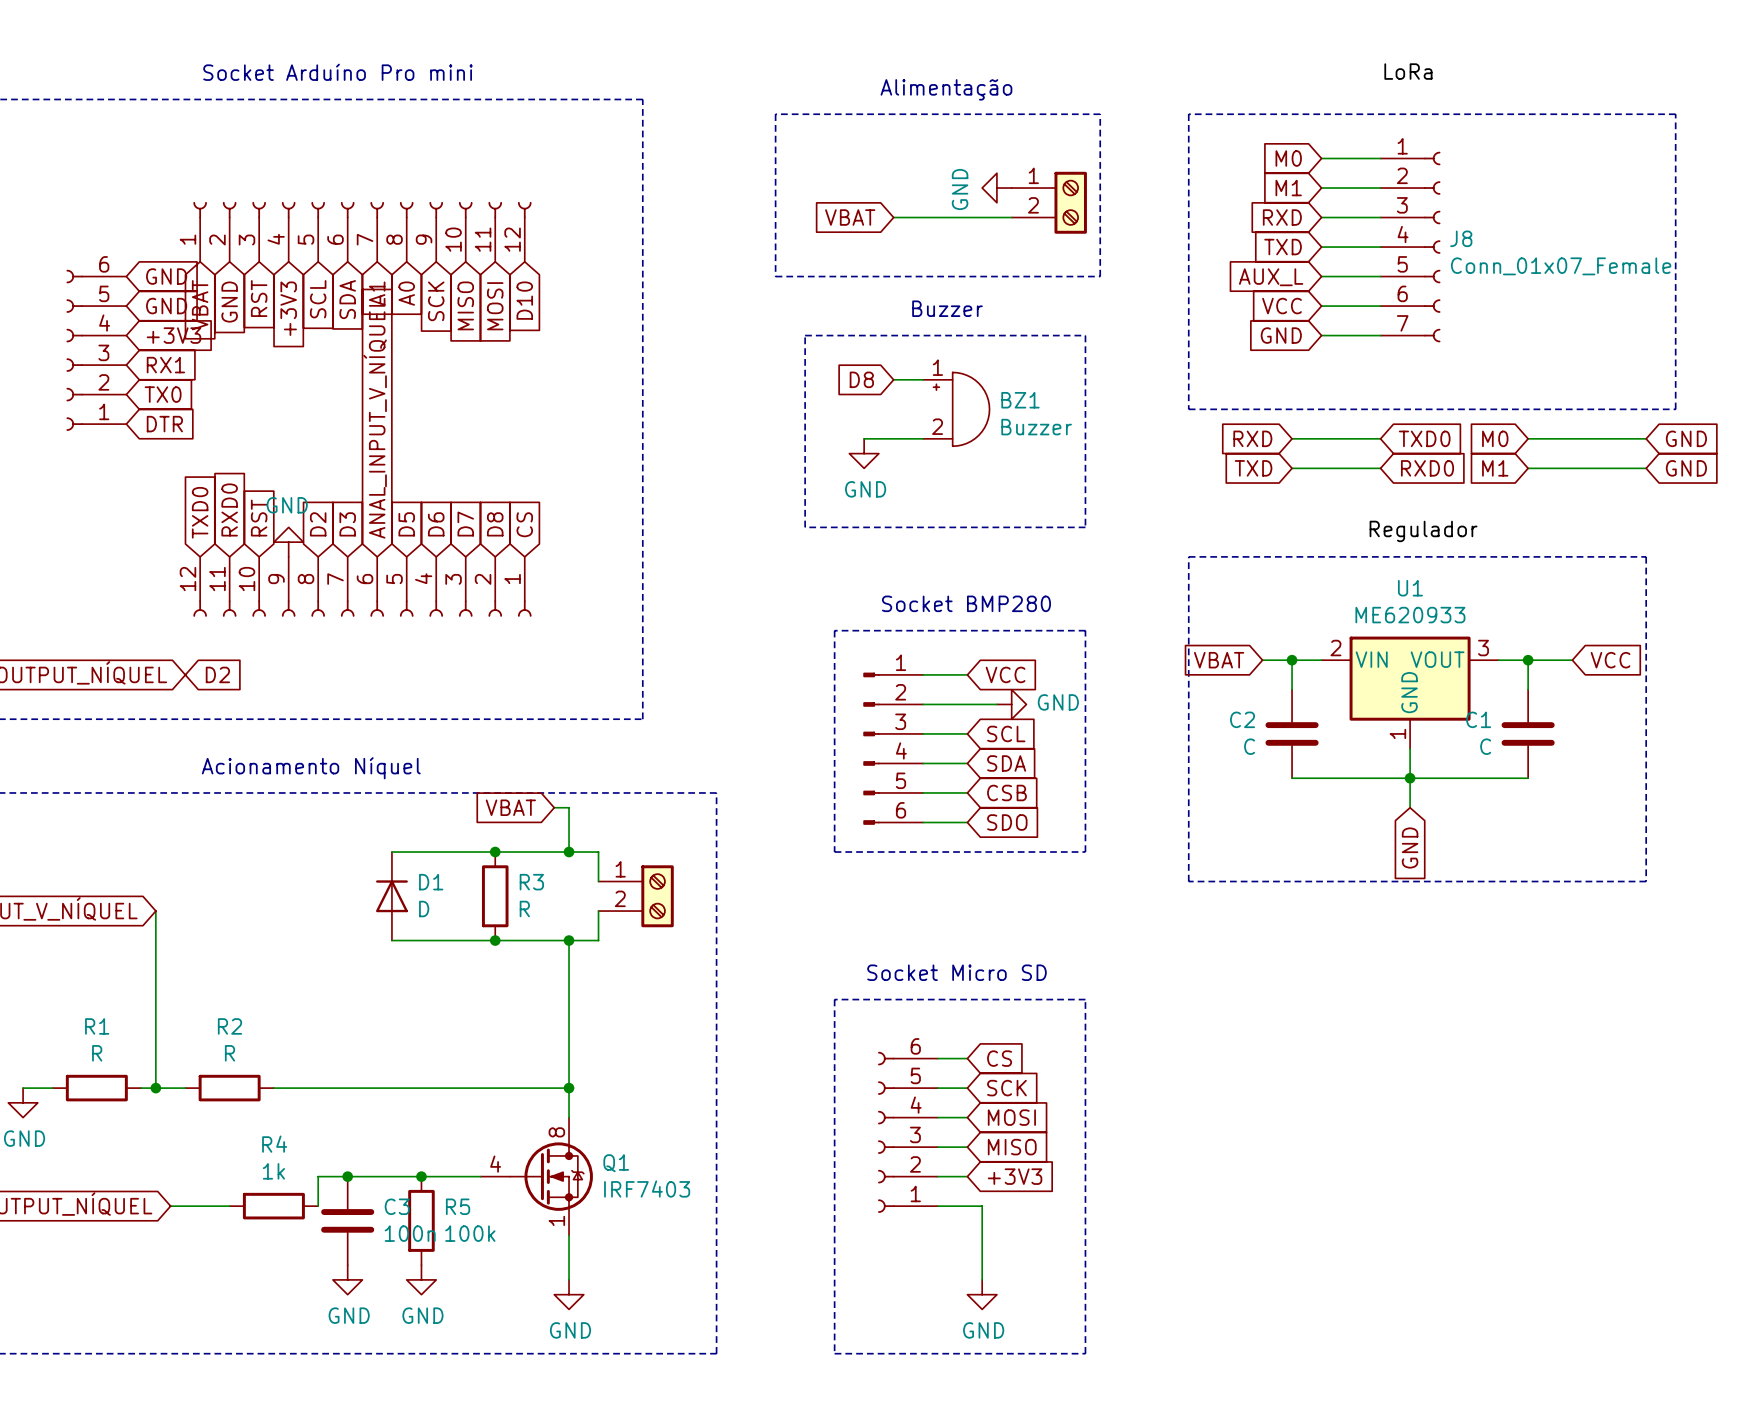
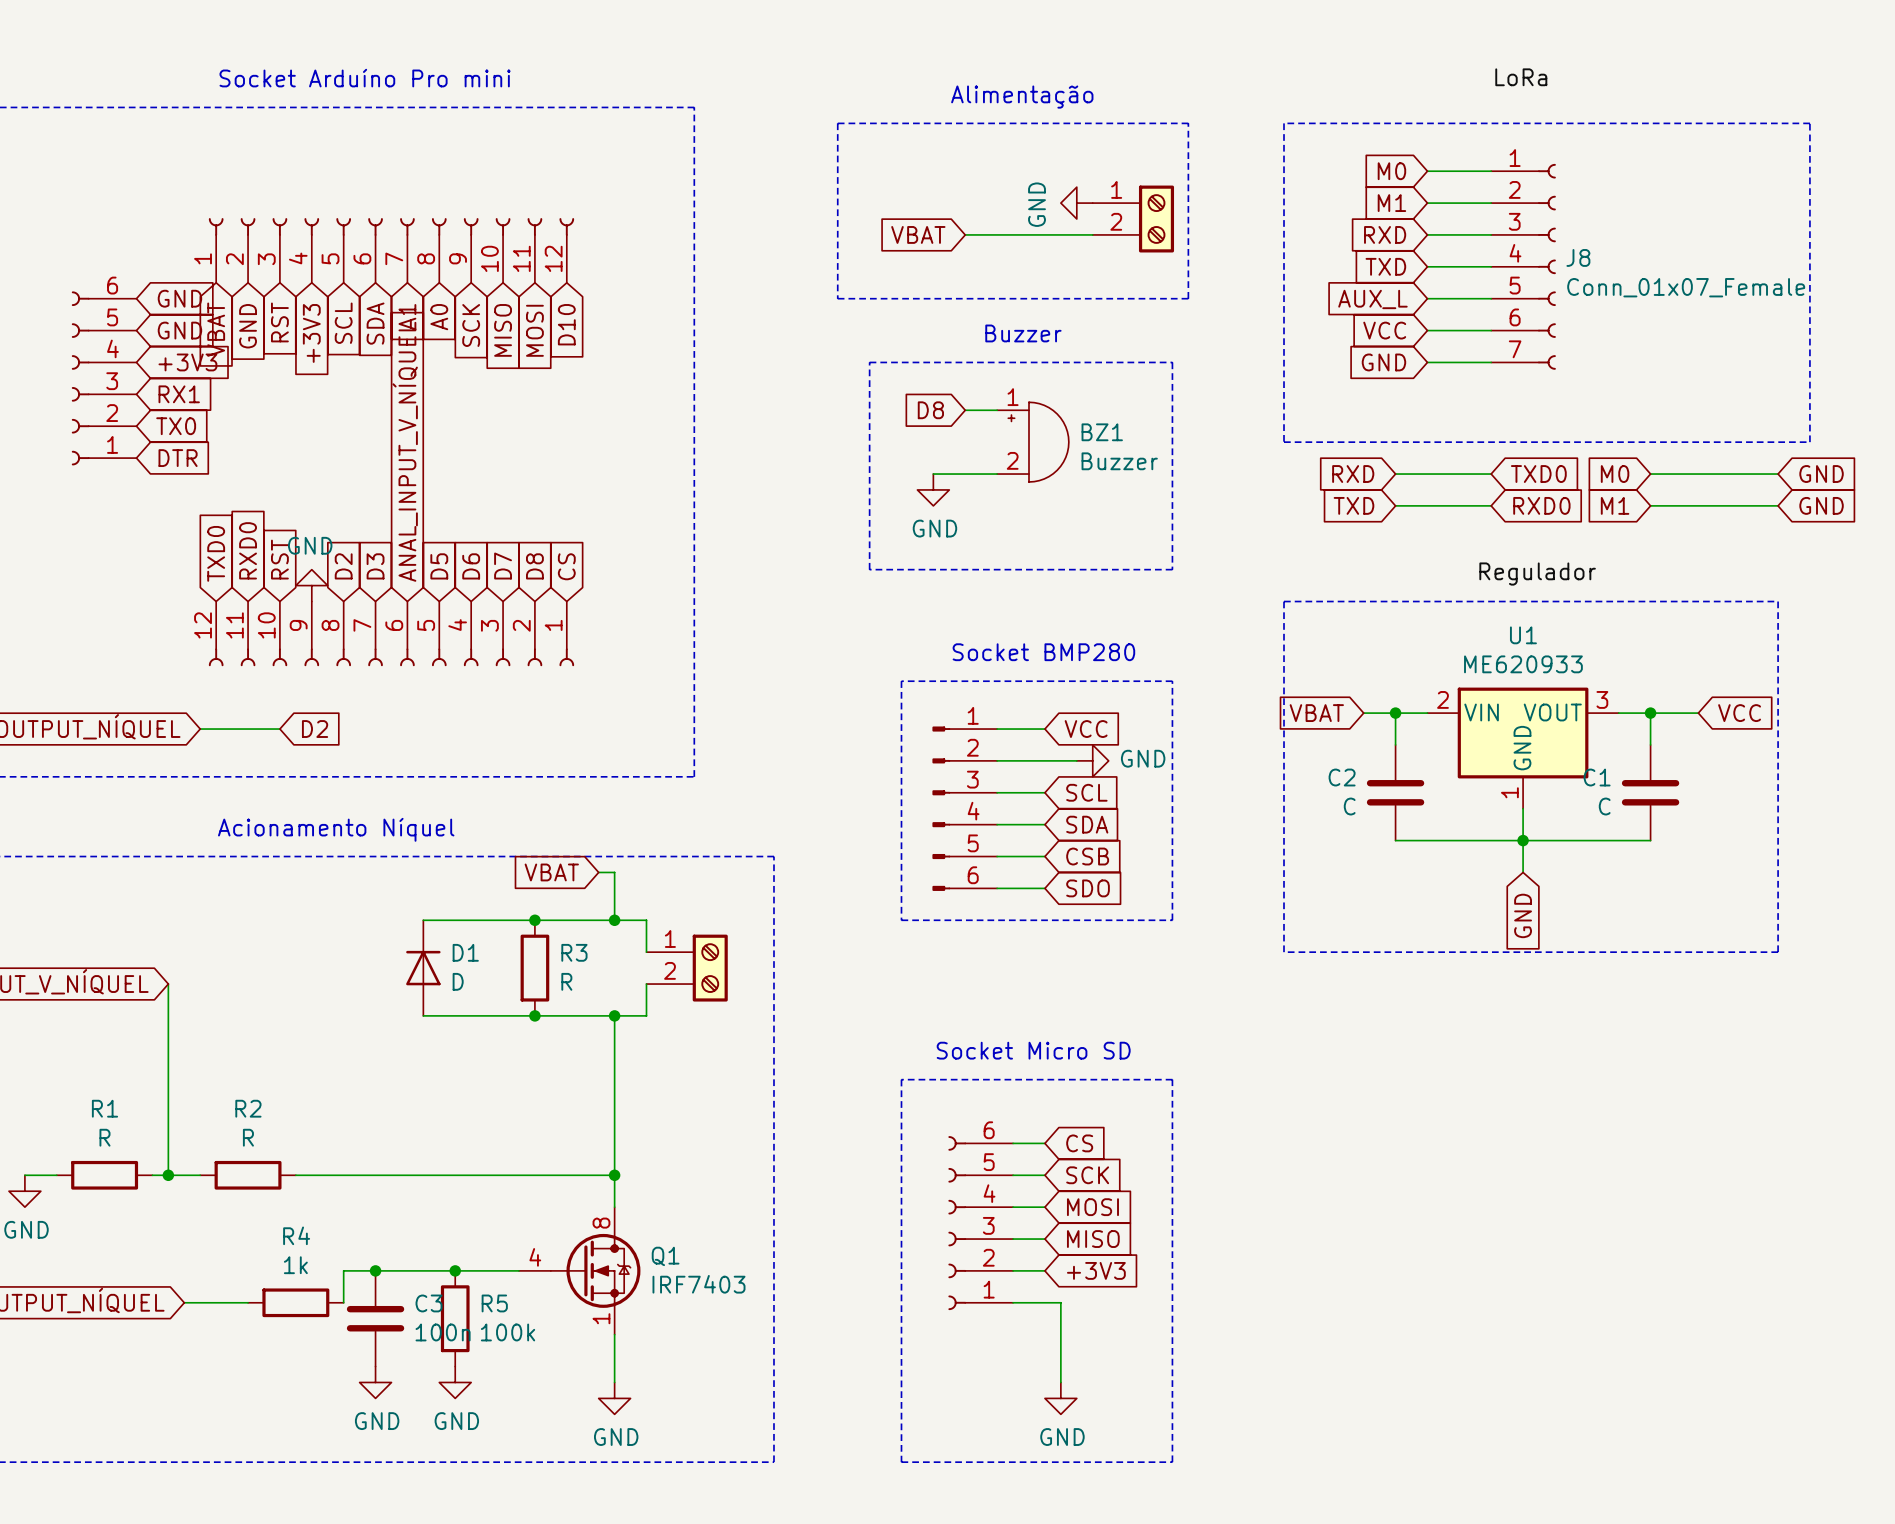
wire: none -> (200, 729) (279, 729)
global label position: D2 (217, 674) -> D2 (315, 729)

